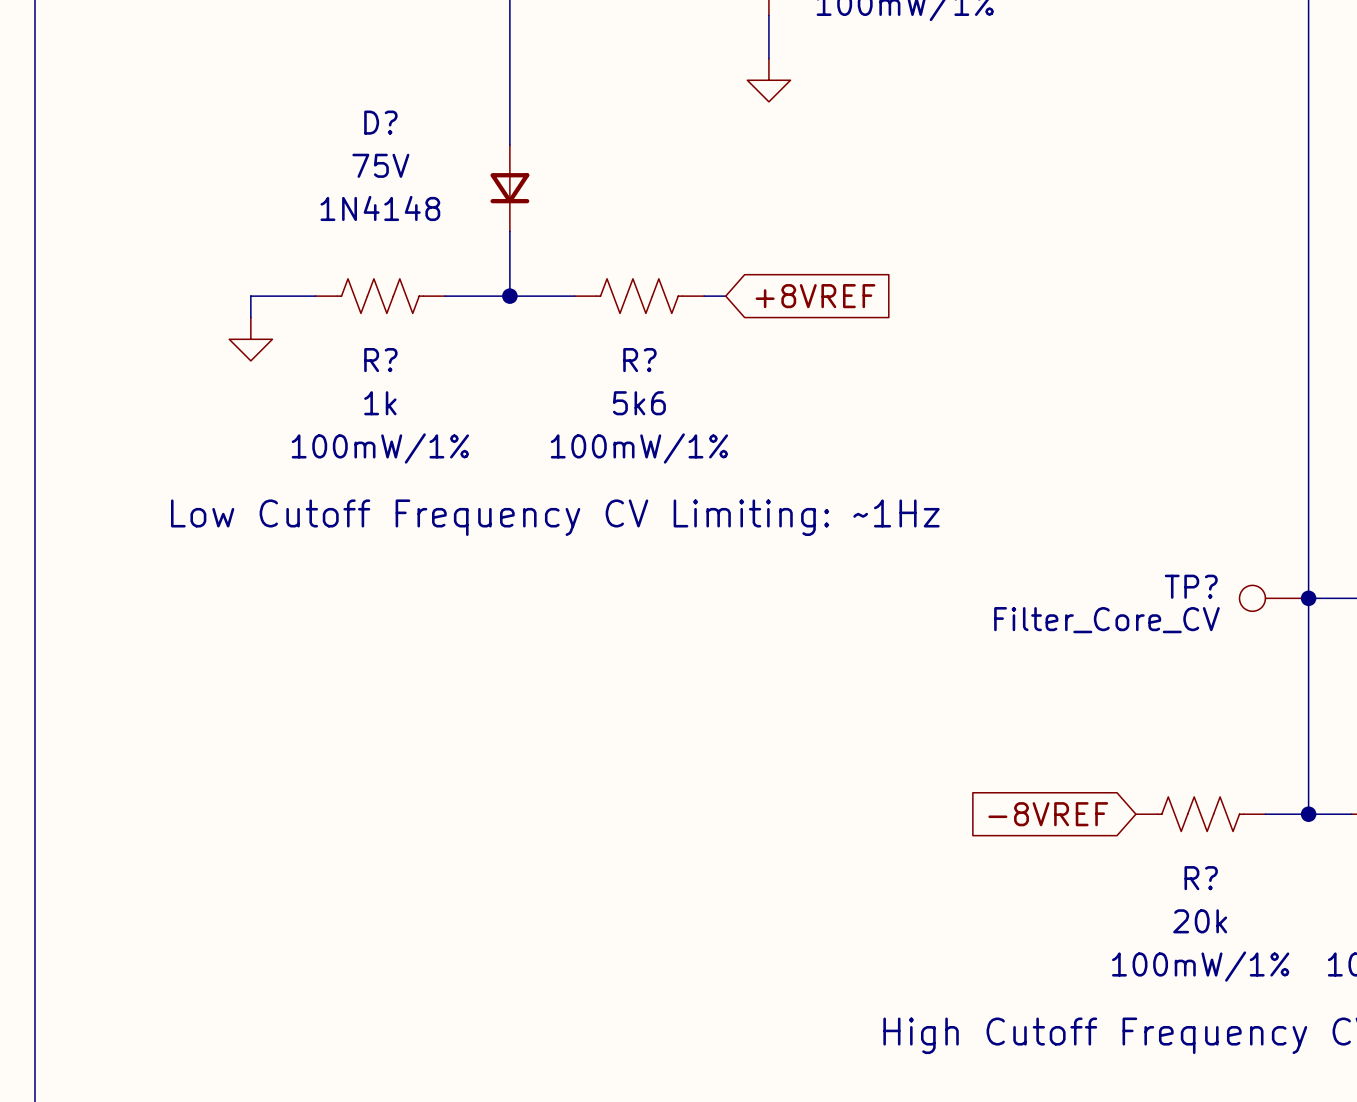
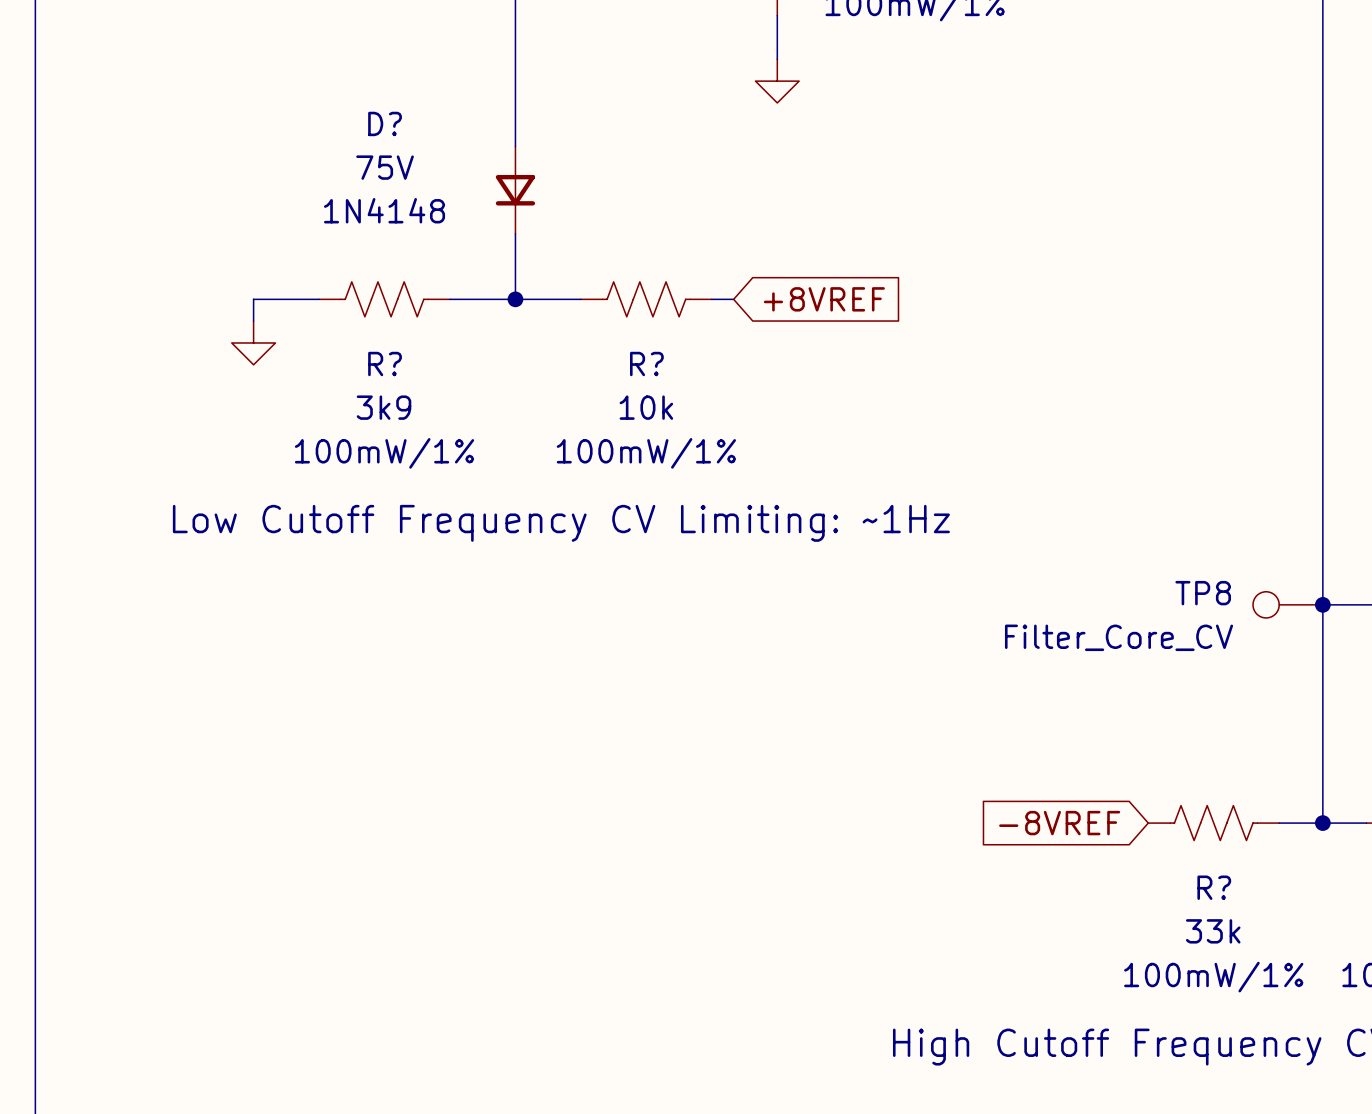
R? value: 1k (380, 403) -> 3k9 (384, 407)
R? value: 5k6 (639, 403) -> 10k (646, 407)
TP? name: TP? (1191, 586) -> TP8 (1203, 593)
TP? text: Filter_Core_CV (1106, 620) -> none
TP? value: none -> Filter_Core_CV (1119, 637)
R? value: 20k (1200, 921) -> 33k (1213, 931)

